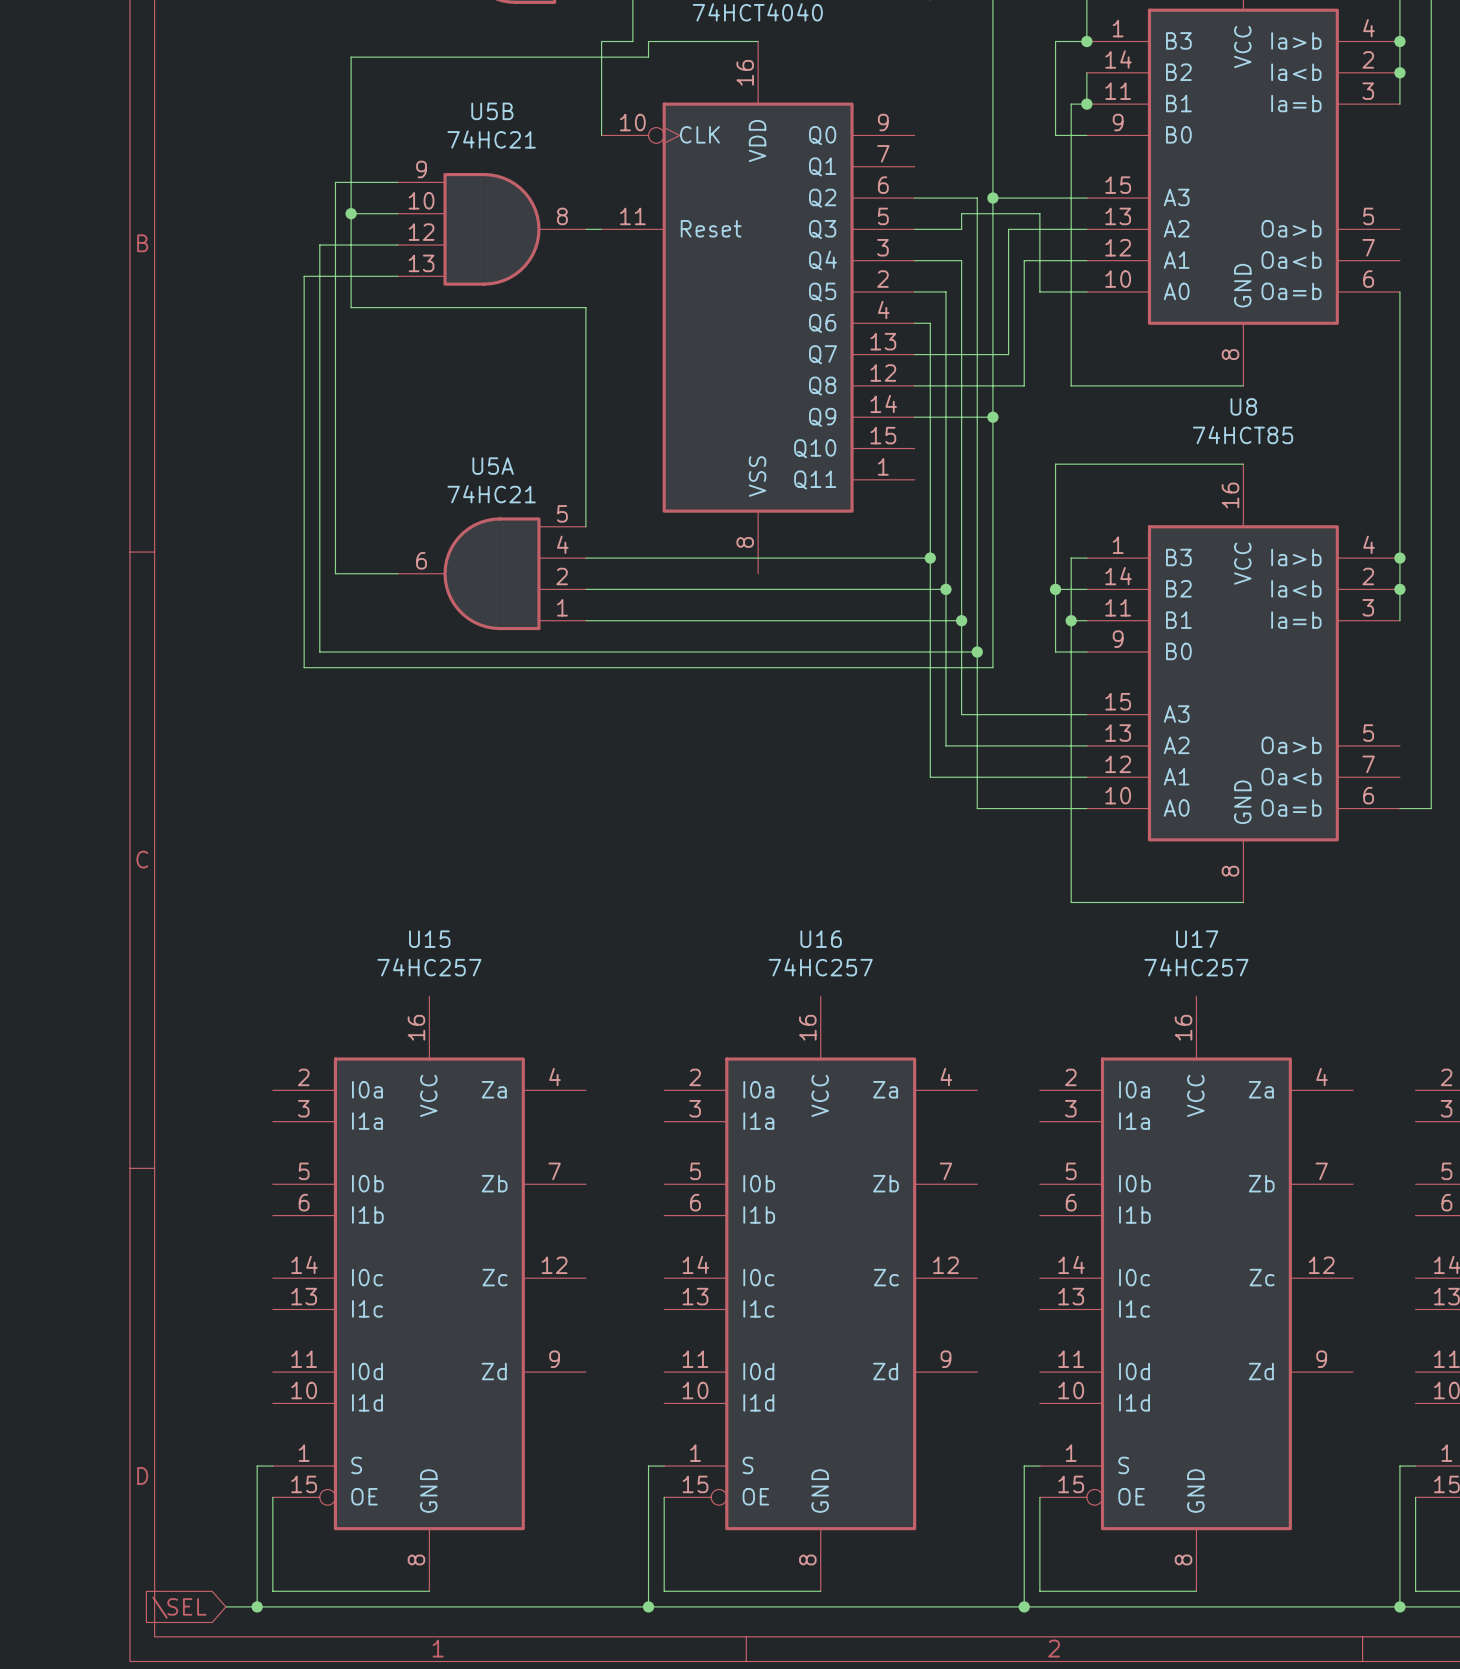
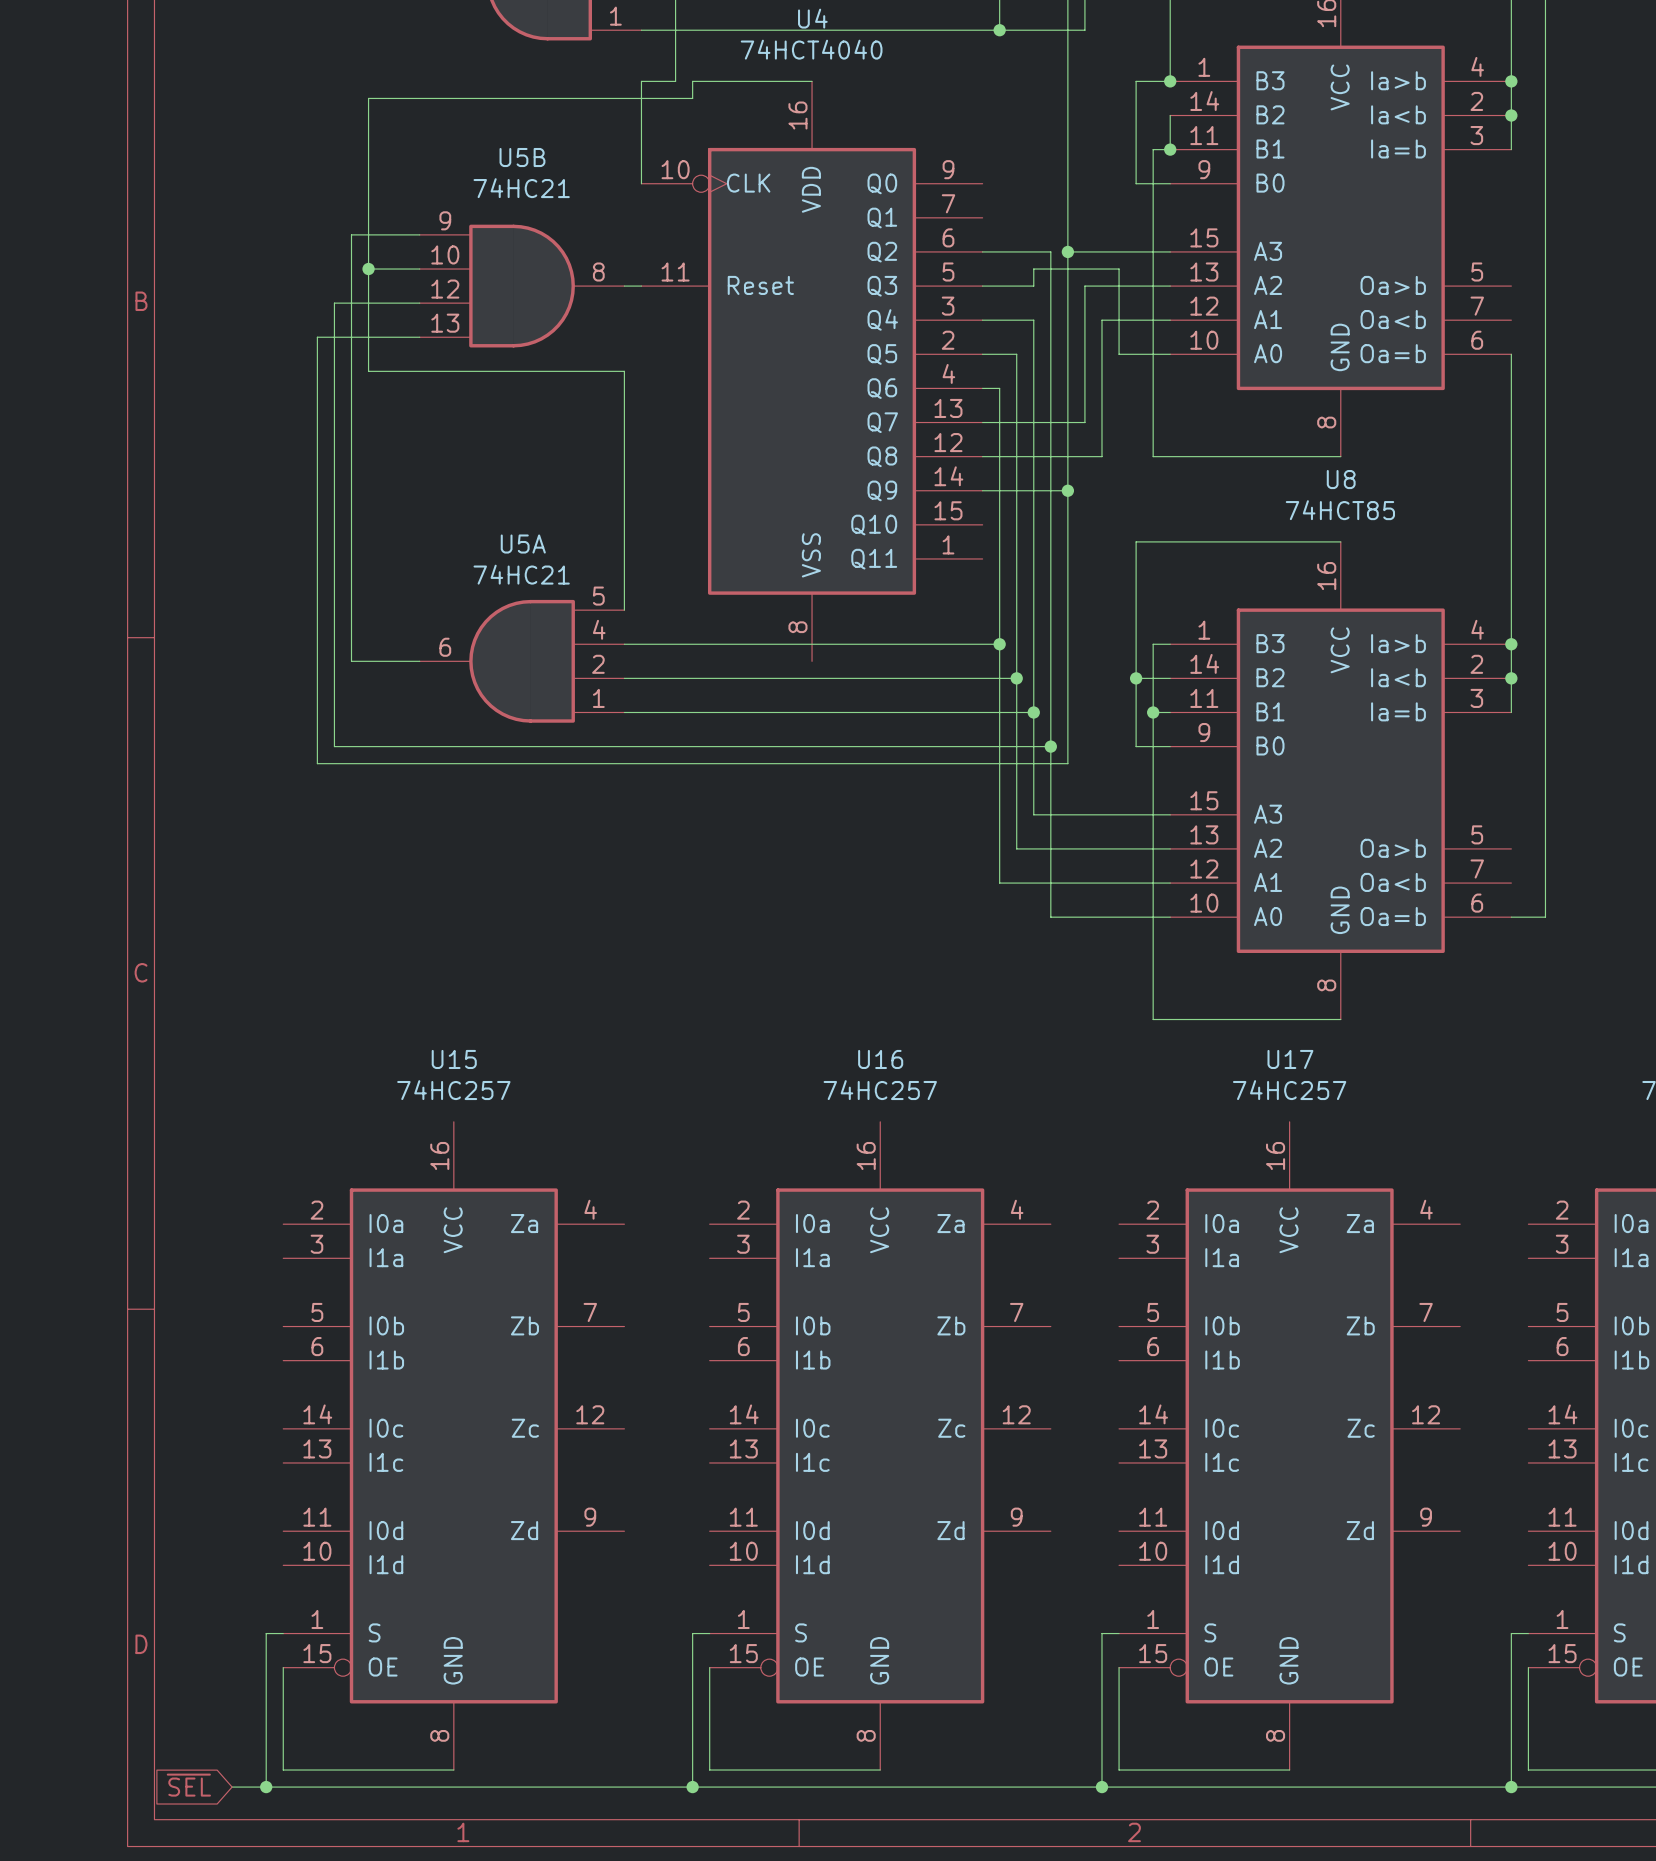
global label: \SEL (179, 1607) -> ~{SEL} (188, 1785)

